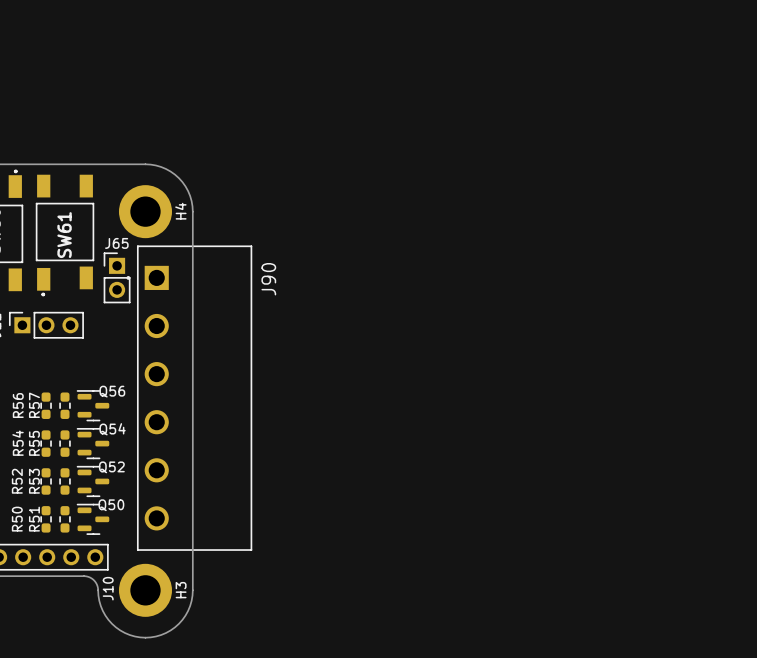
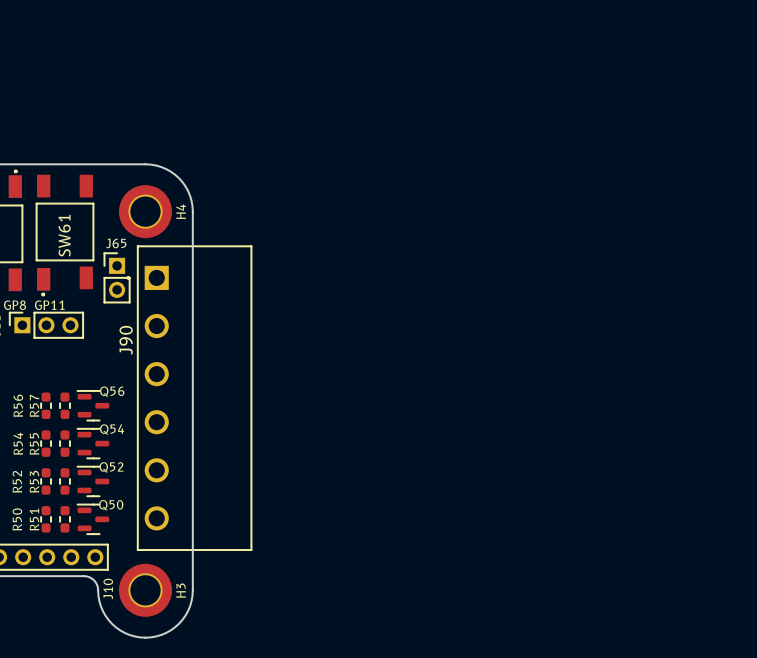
J90 name position: J90 (268, 279) -> J90 (126, 340)
text: none -> GP8 (15, 305)
text: none -> GP11 (49, 305)

